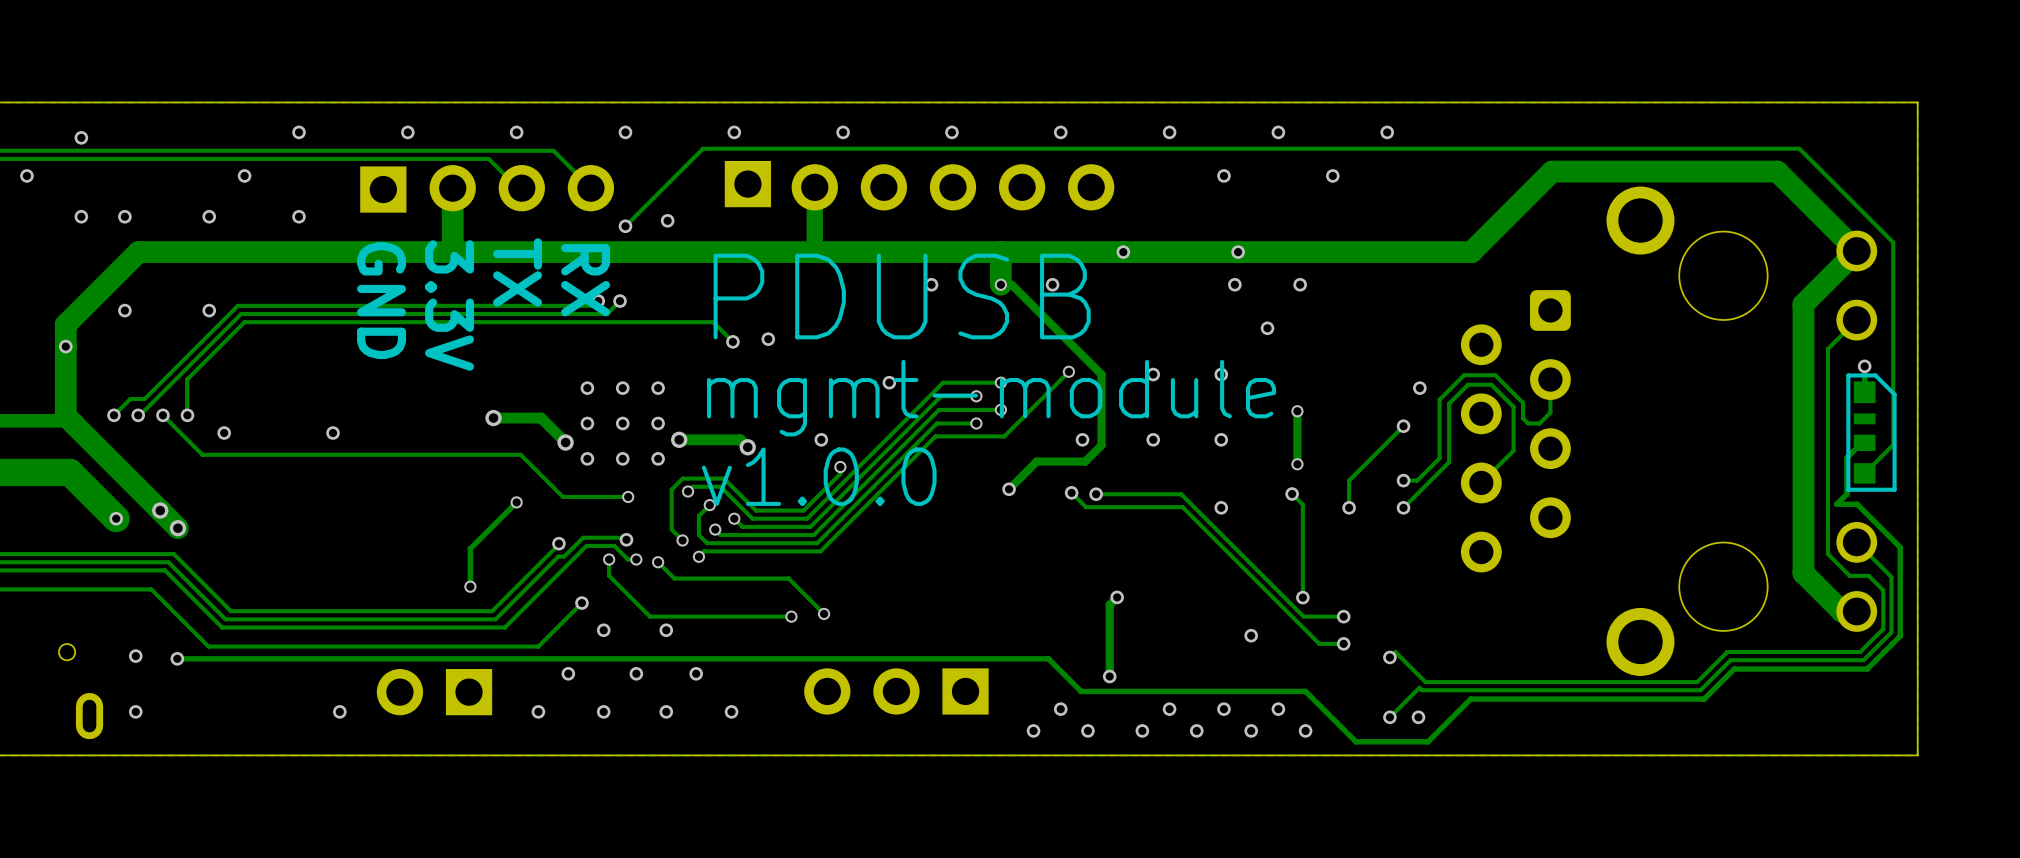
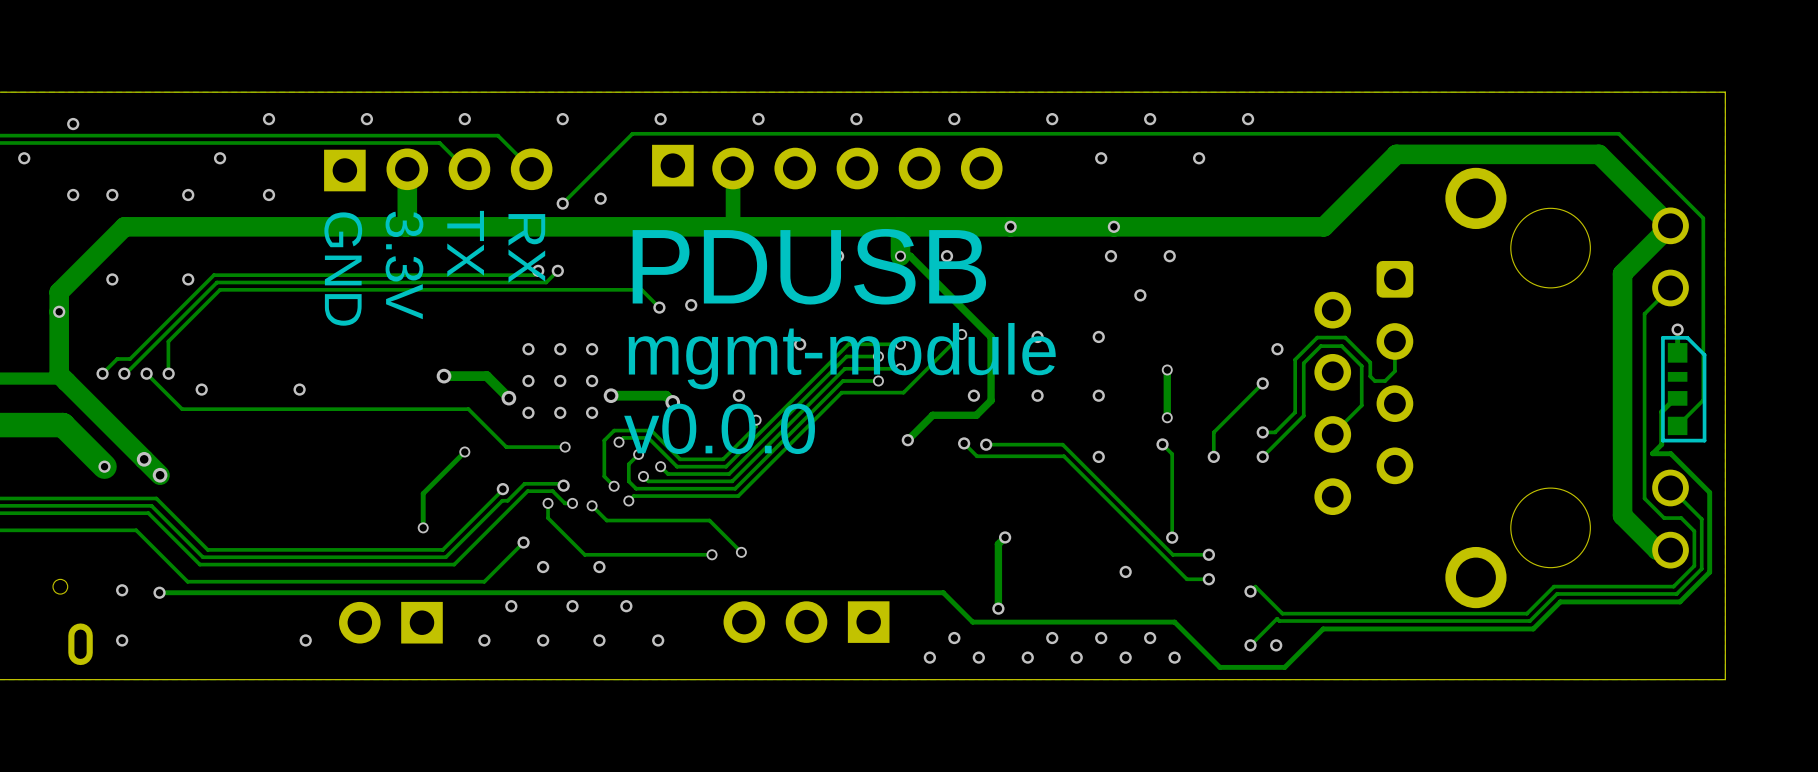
text: v1.0.0 (819, 476) -> v0.0.0 (719, 428)

